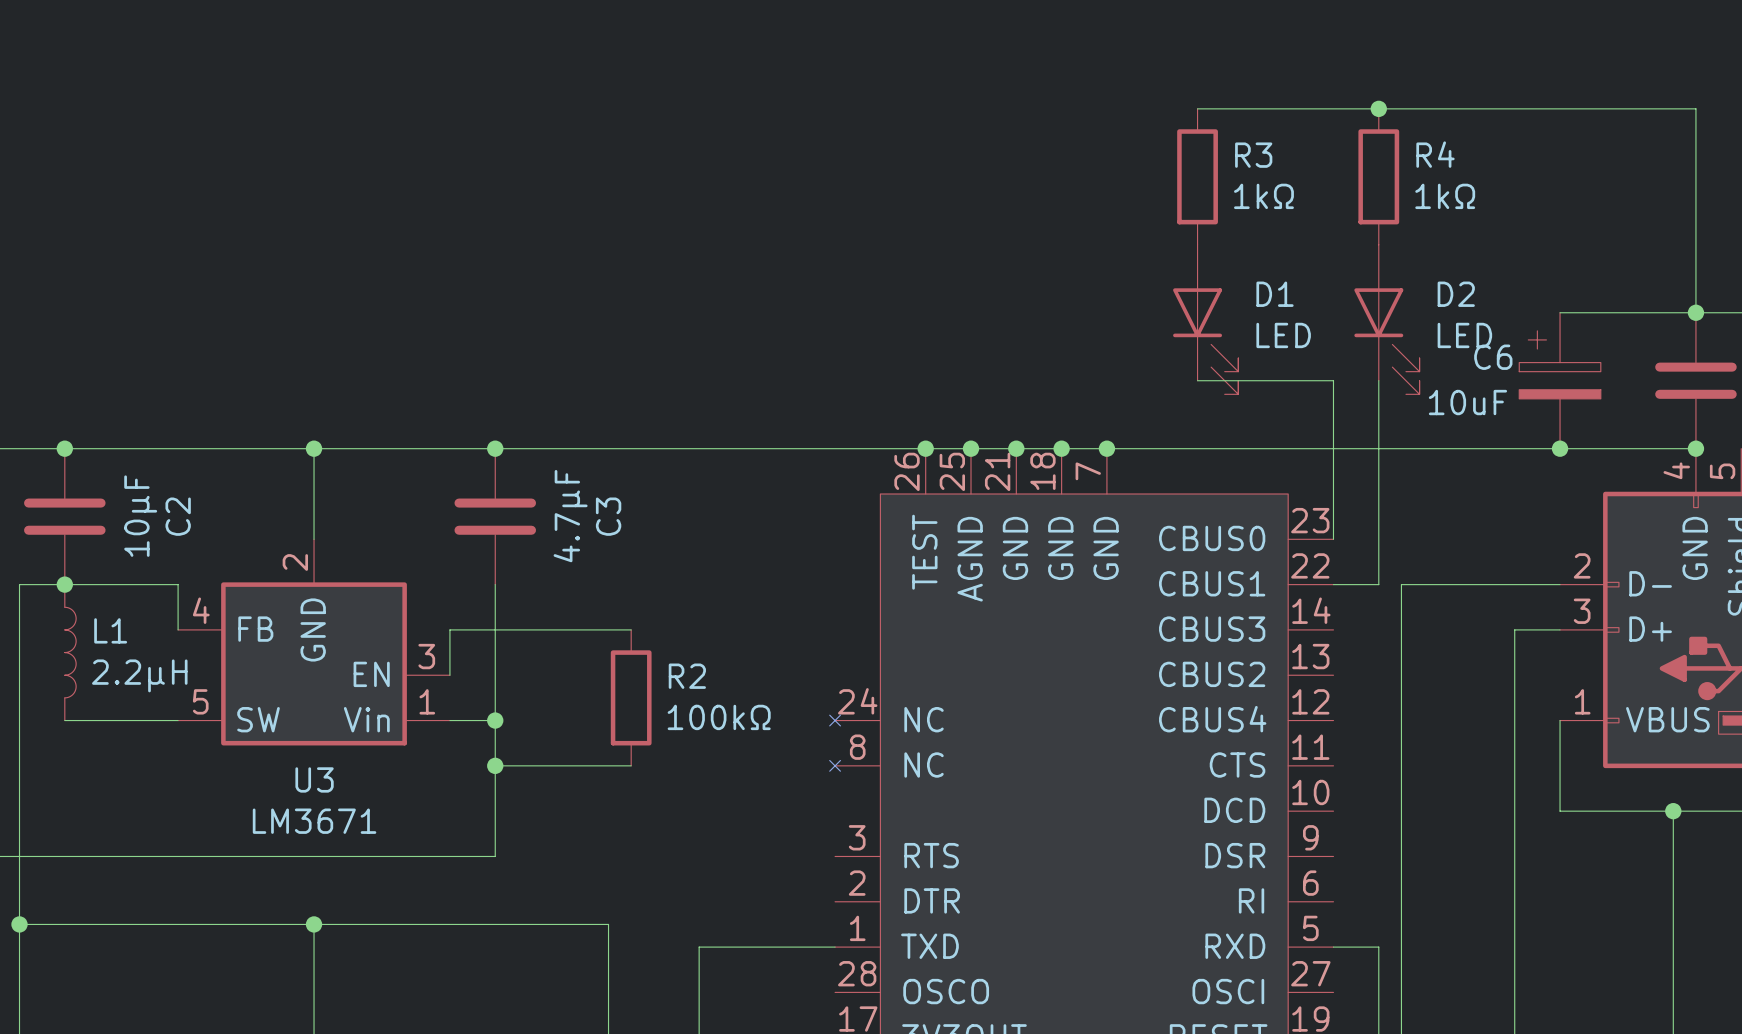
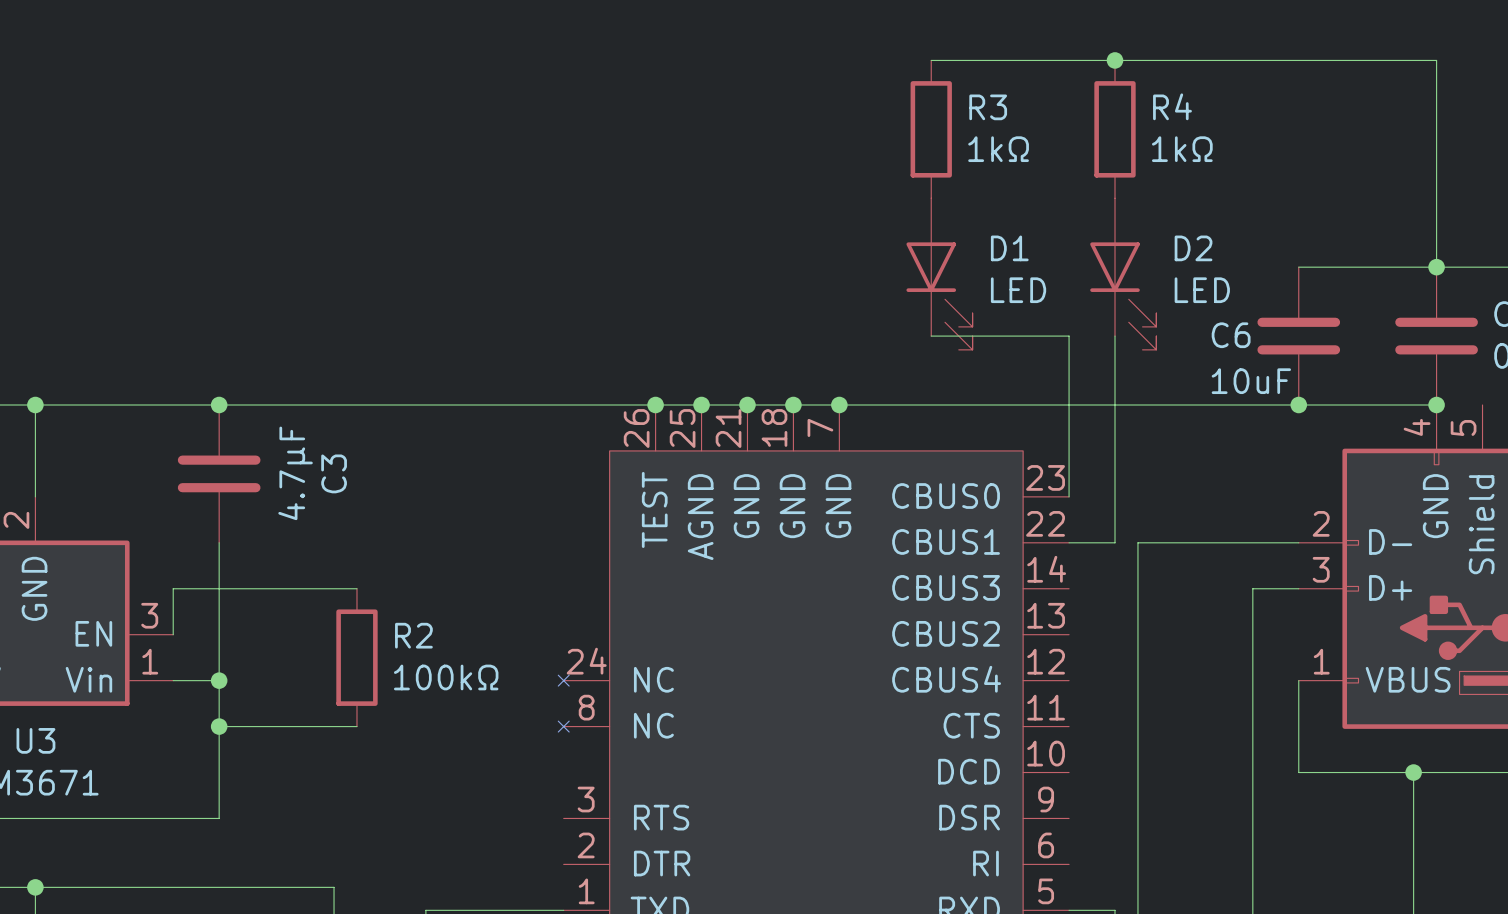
C6 symbol: [1519, 312, 1601, 449] -> [1257, 267, 1341, 405]
C6 value position: 10uF (1467, 402) -> 10uF (1251, 381)

